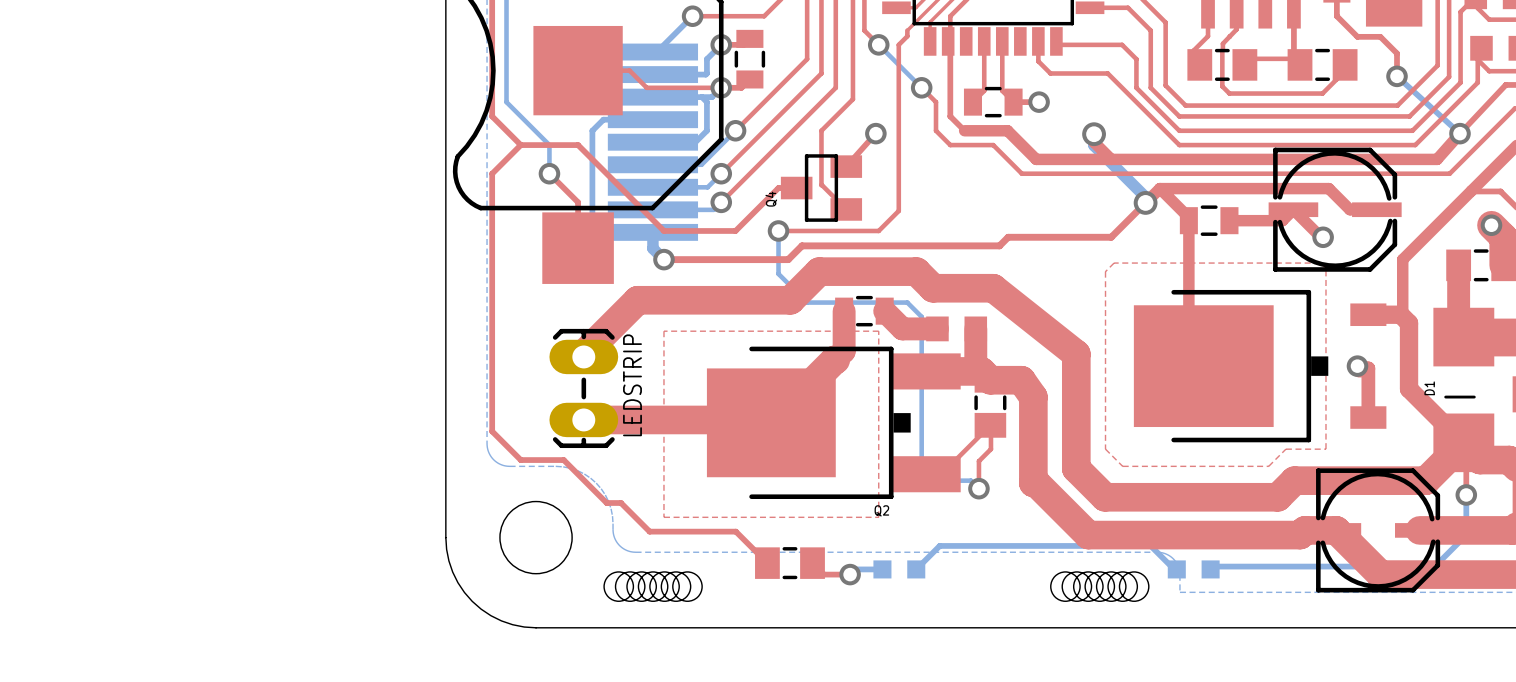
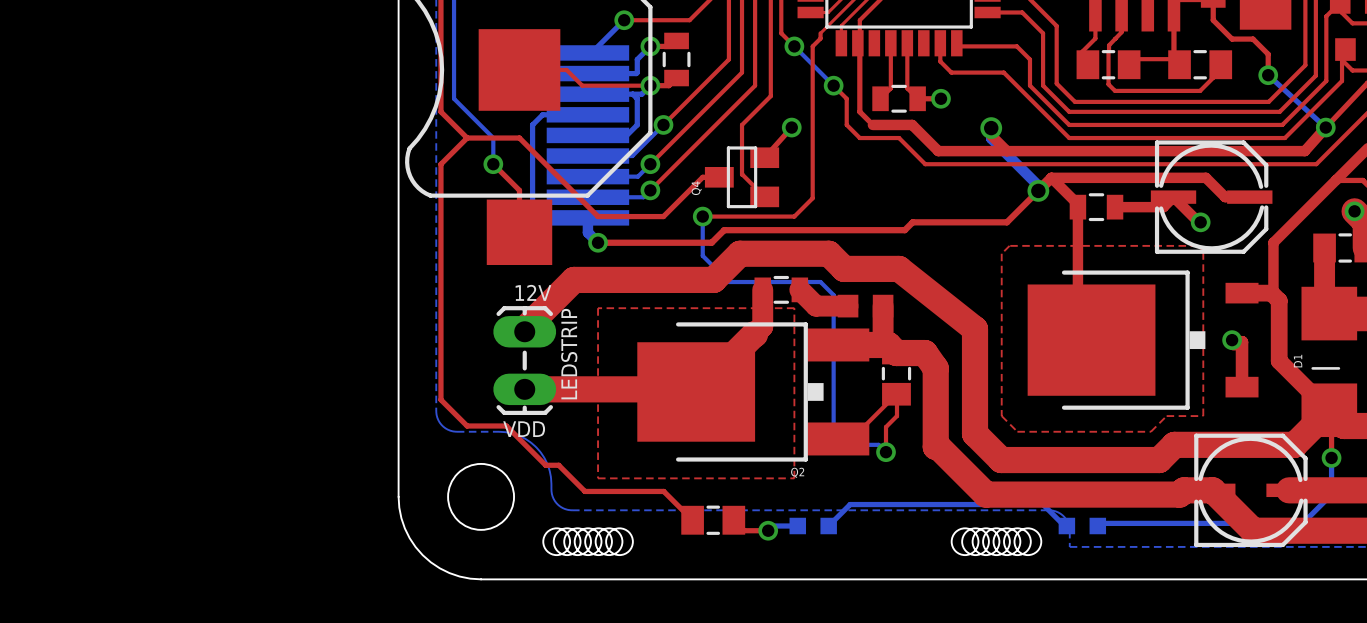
text: none -> 12V (533, 292)
text: none -> VDD (524, 429)

